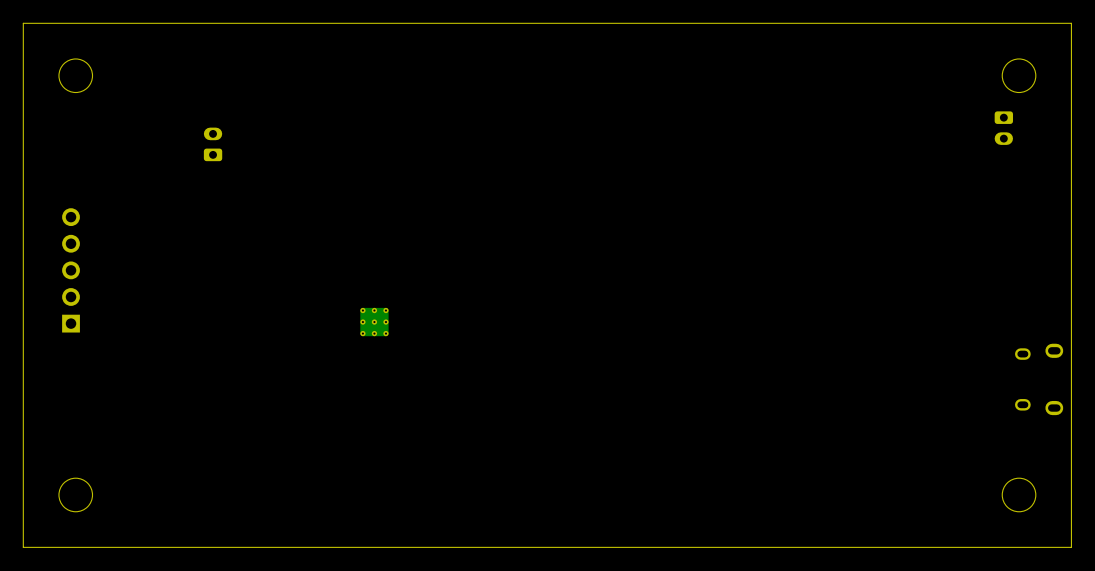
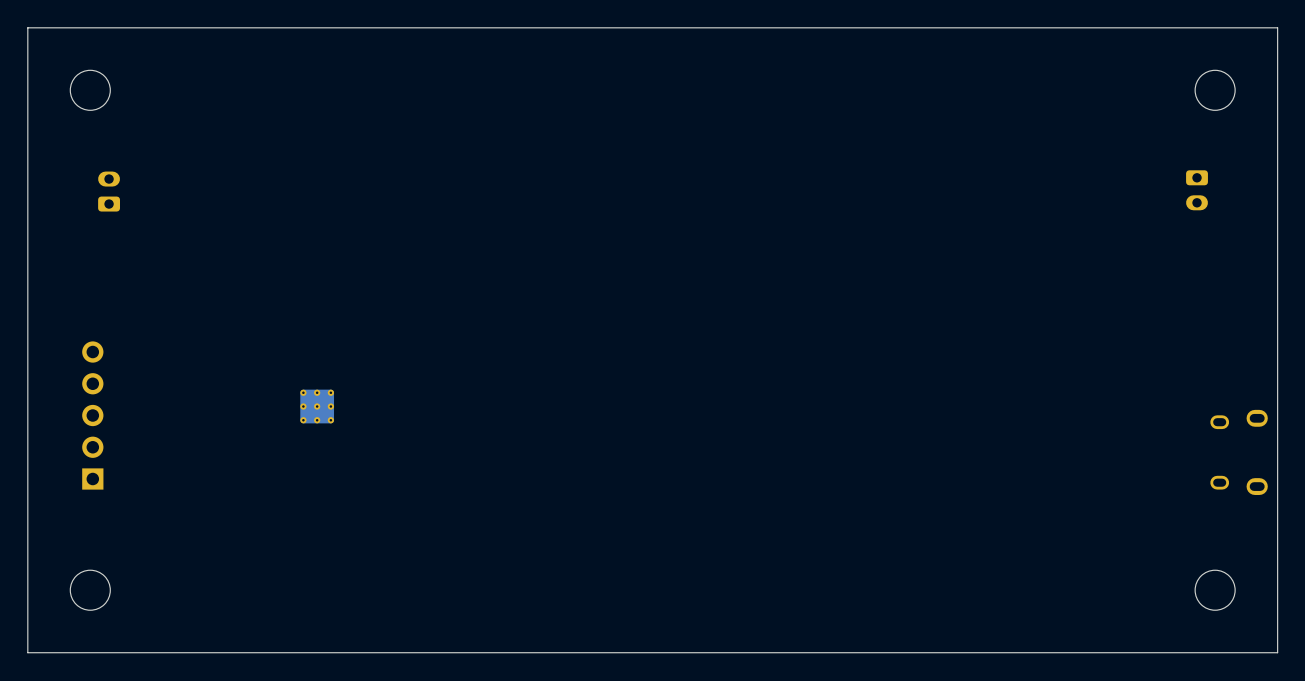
part position: (1003, 128) -> (1197, 190)
part position: (213, 144) -> (109, 191)
part position: (71, 270) -> (92, 415)
part position: (374, 322) -> (317, 406)

